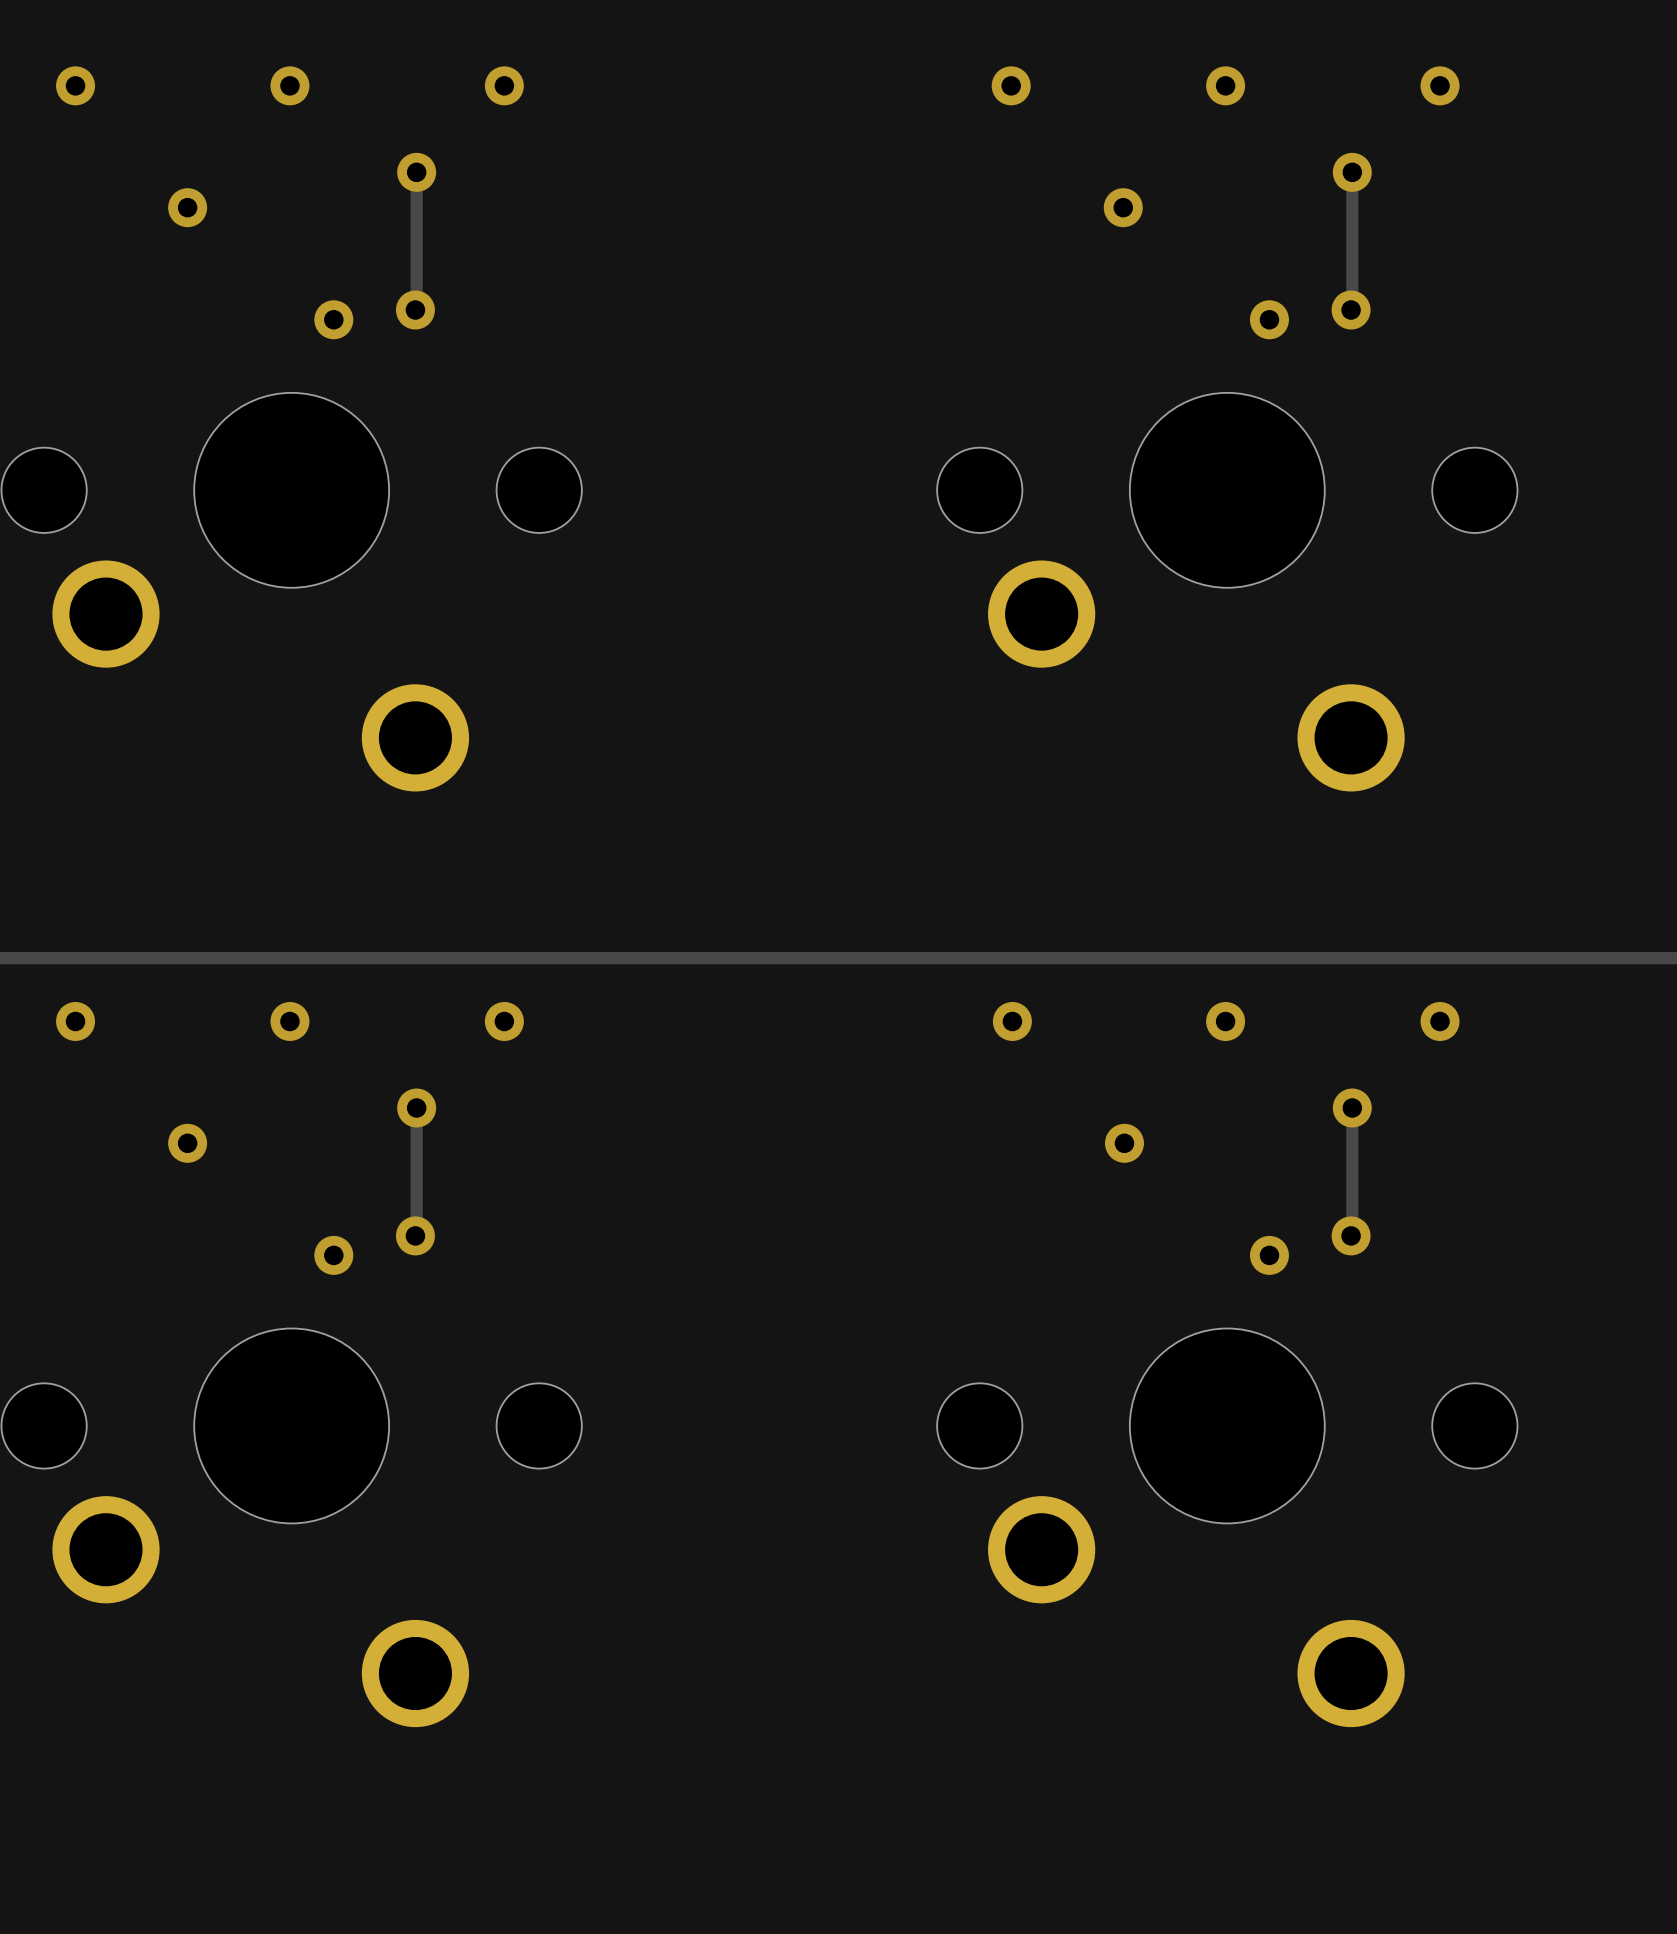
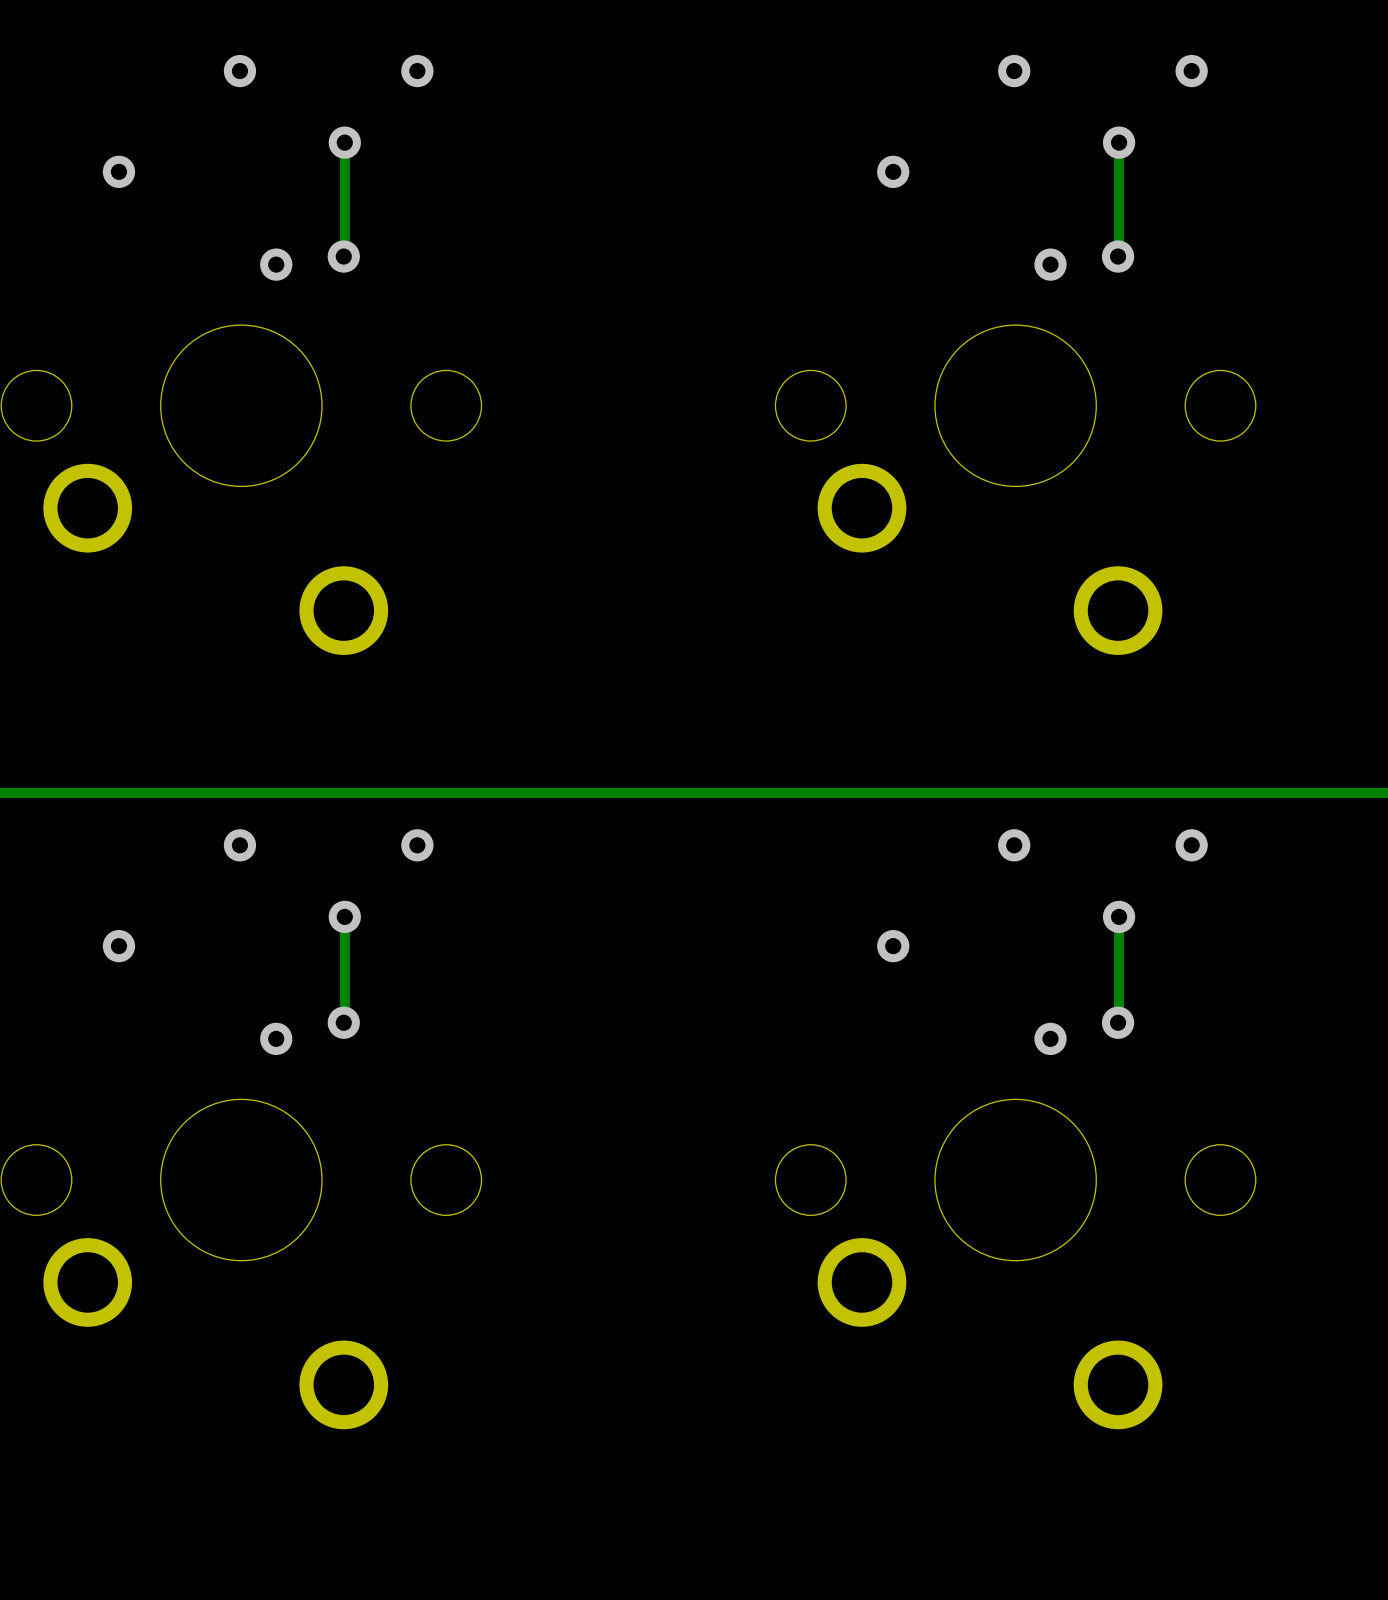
via: (75, 85) -> none
via: (1011, 85) -> none
via position: (187, 207) -> (118, 171)
via position: (1123, 207) -> (893, 171)
via: (75, 1021) -> none
via: (1012, 1021) -> none
via position: (187, 1143) -> (118, 946)
via position: (1124, 1143) -> (893, 946)

